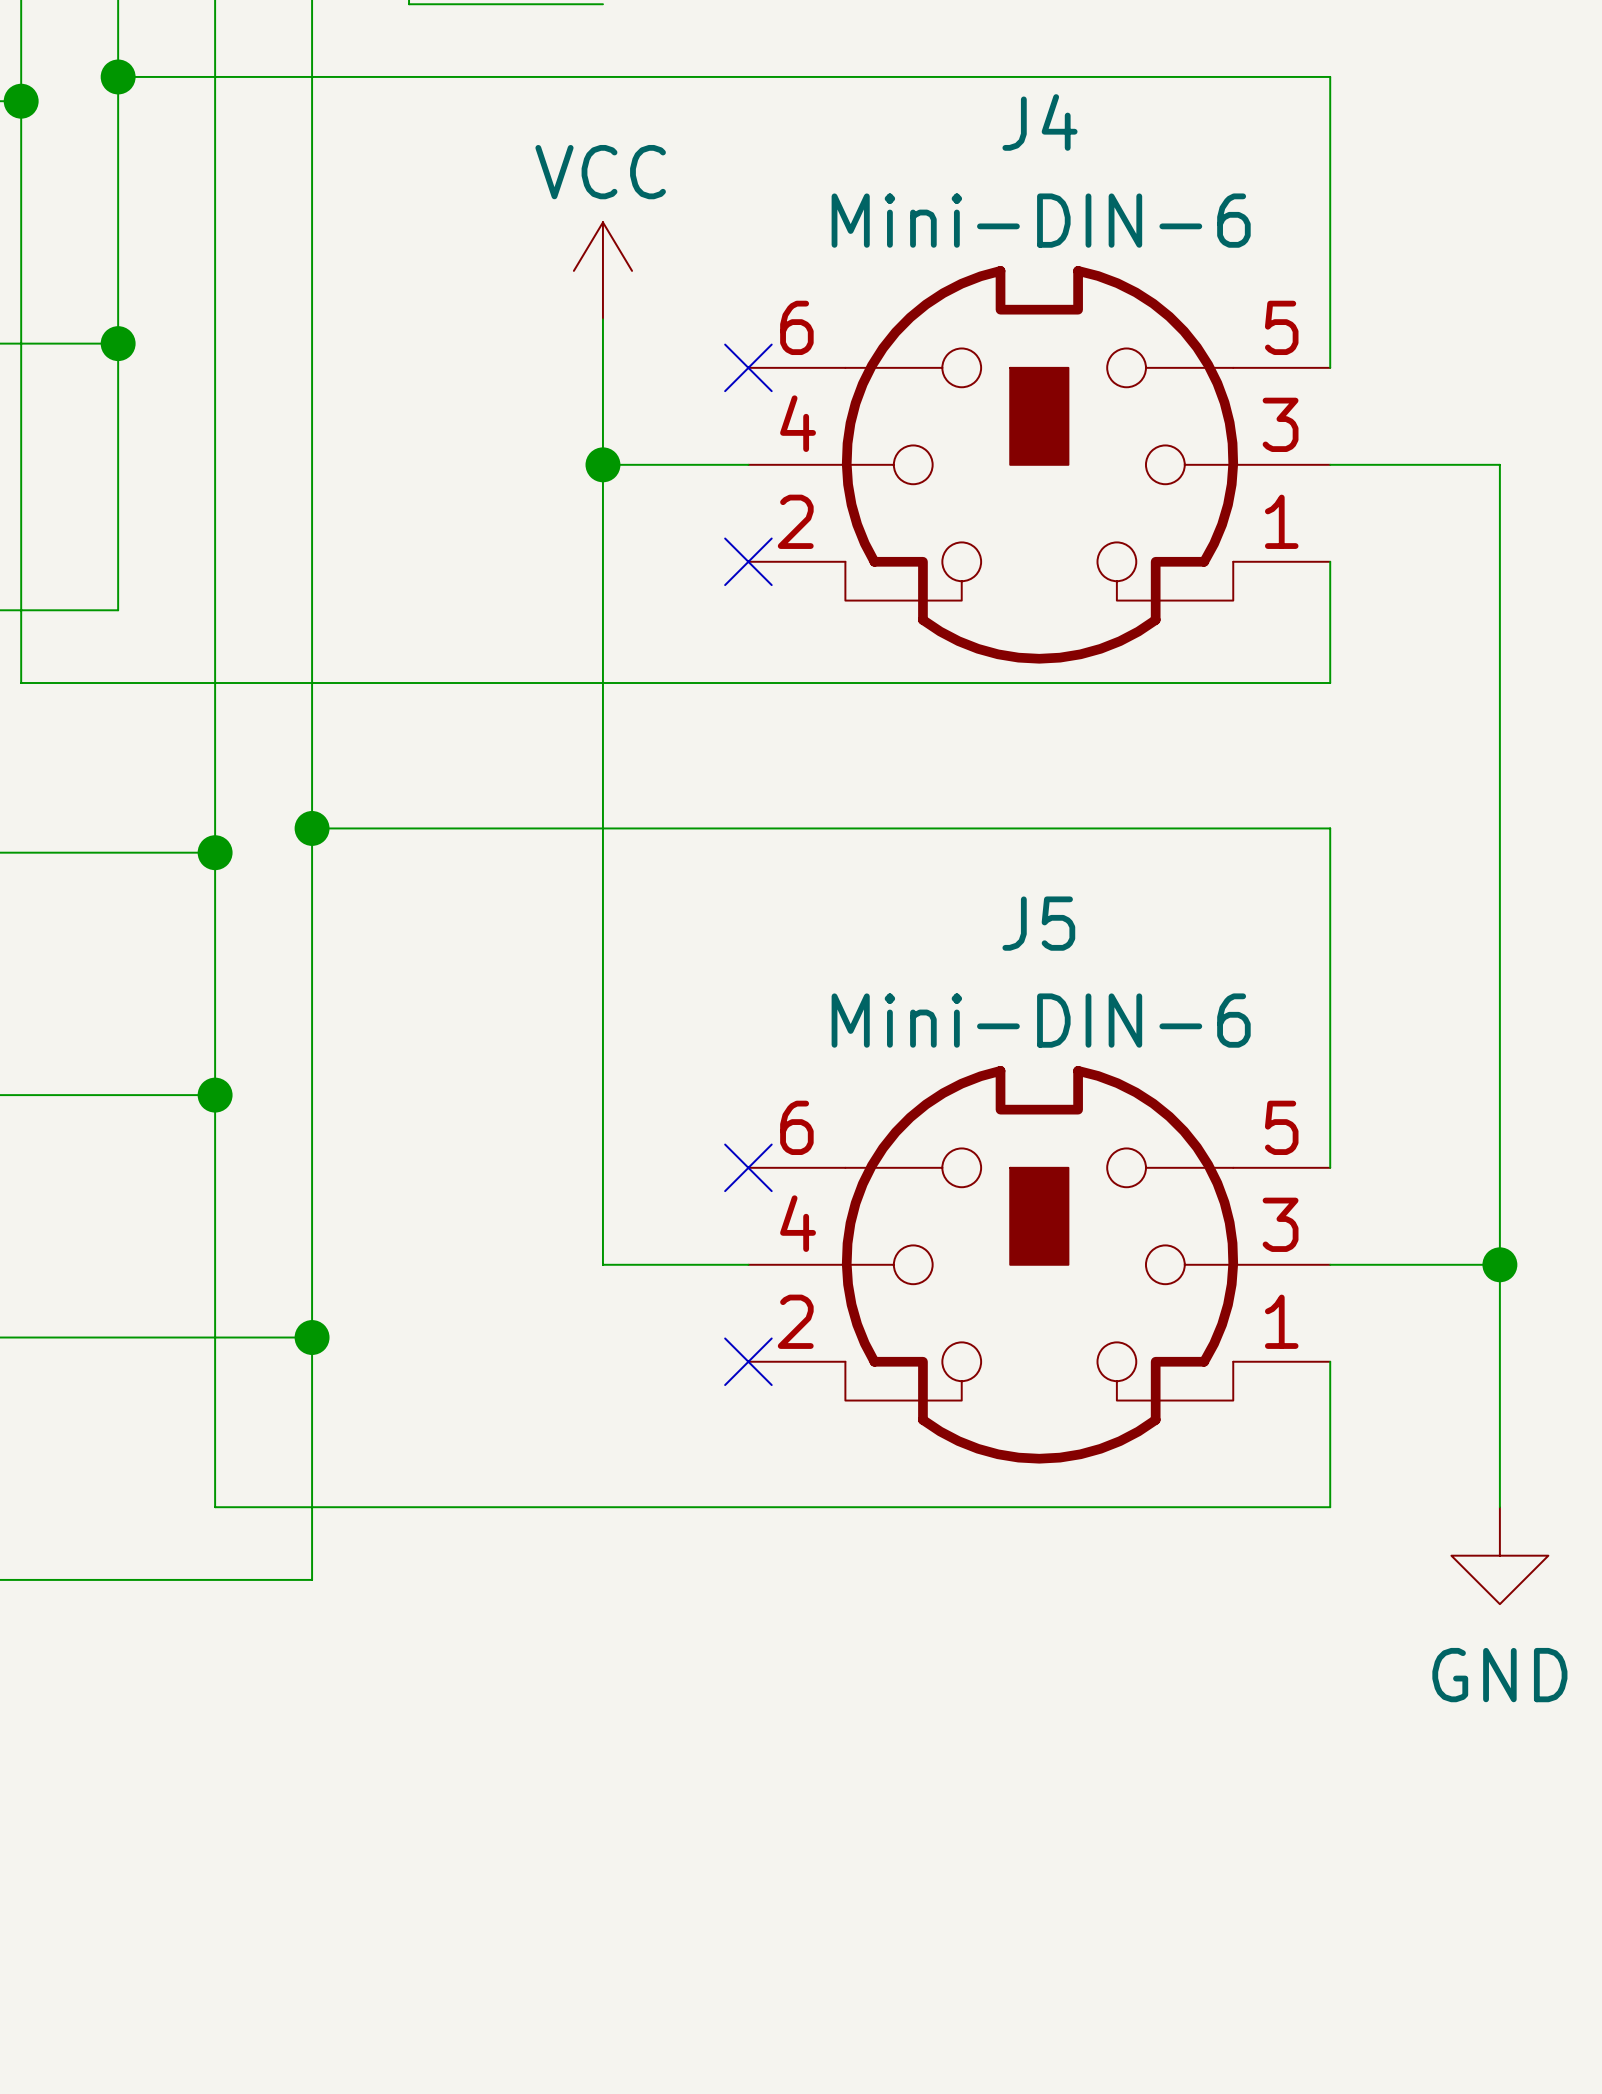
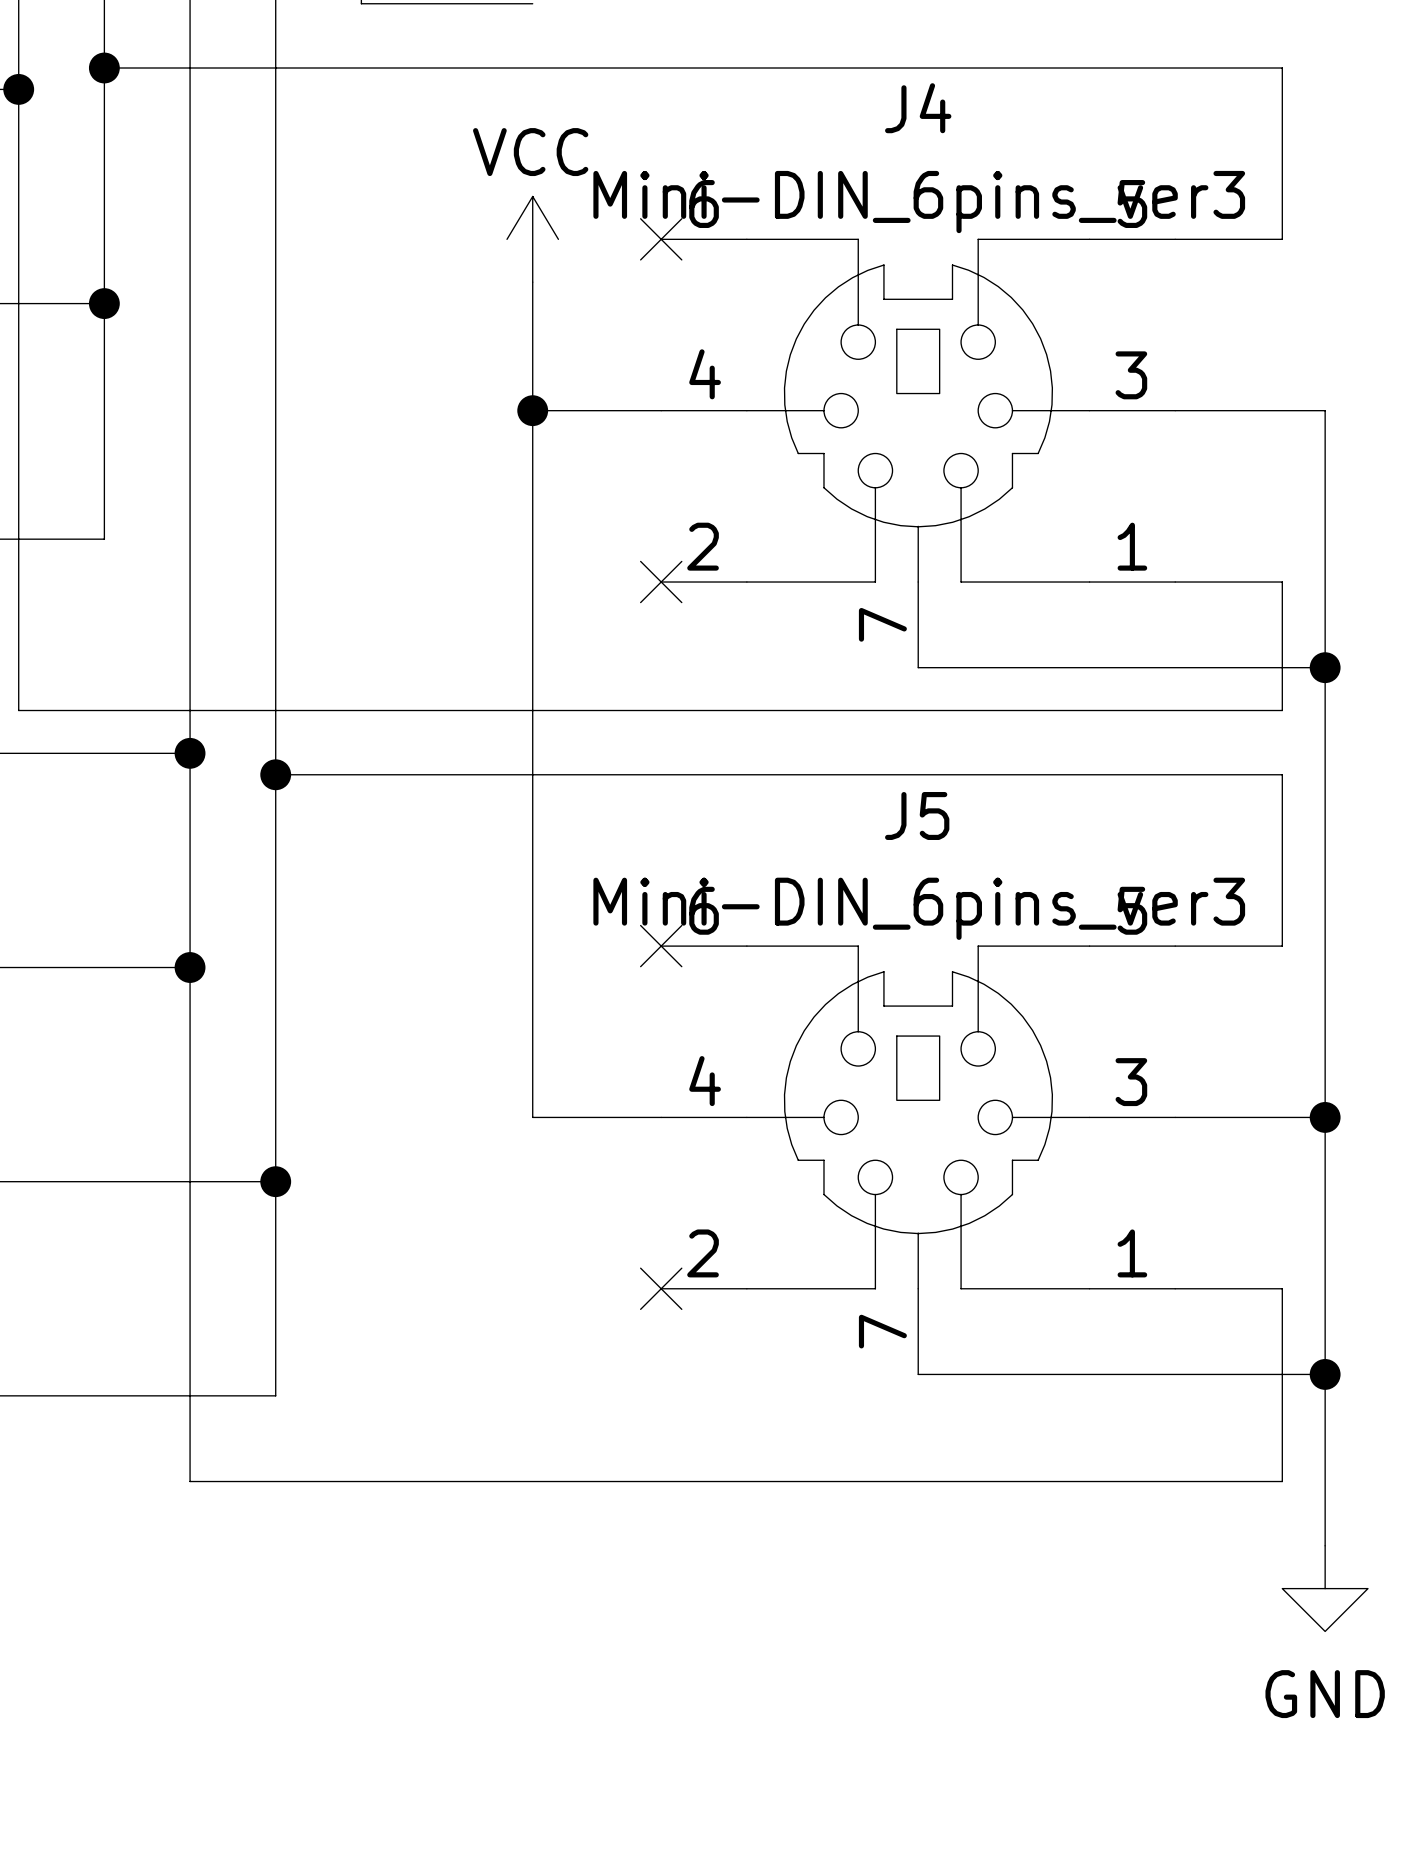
wire: (1330, 76) (1330, 367) -> (1175, 68) (1282, 68) (1282, 239) (1175, 239)
J4 value: Mini-DIN-6 (1041, 220) -> Mini-DIN_6pins_ver3 (919, 202)
J4 symbol: [748, 266, 1331, 664] -> [661, 239, 1176, 668]
no-connect mark position: (748, 367) -> (661, 239)
no-connect mark position: (748, 561) -> (661, 582)
wire: (1330, 561) (1330, 683) (21, 683) -> (1175, 582) (1282, 582) (1282, 710) (18, 710) (18, 603)
wire: none -> (918, 667) (1325, 667)
junction: none -> (1325, 667)
wire: (312, 828) (1330, 828) (1330, 1167) -> none
junction position: (312, 828) -> (275, 774)
wire: none -> (275, 774) (1282, 774) (1282, 946) (1175, 946)
J5 value: Mini-DIN-6 (1041, 1020) -> Mini-DIN_6pins_ver3 (919, 908)
J5 symbol: [748, 1066, 1331, 1464] -> [661, 946, 1176, 1375]
no-connect mark position: (748, 1167) -> (661, 946)
no-connect mark position: (748, 1361) -> (661, 1288)
wire: (1330, 1361) (1330, 1507) (215, 1507) -> (1175, 1288) (1282, 1288) (1282, 1481) (190, 1481) (190, 1331)
wire: none -> (1325, 1331) (1325, 1545)
wire: none -> (918, 1374) (1325, 1374)
junction: none -> (1325, 1374)
power symbol position: GND (1499, 1555) -> GND (1325, 1588)

